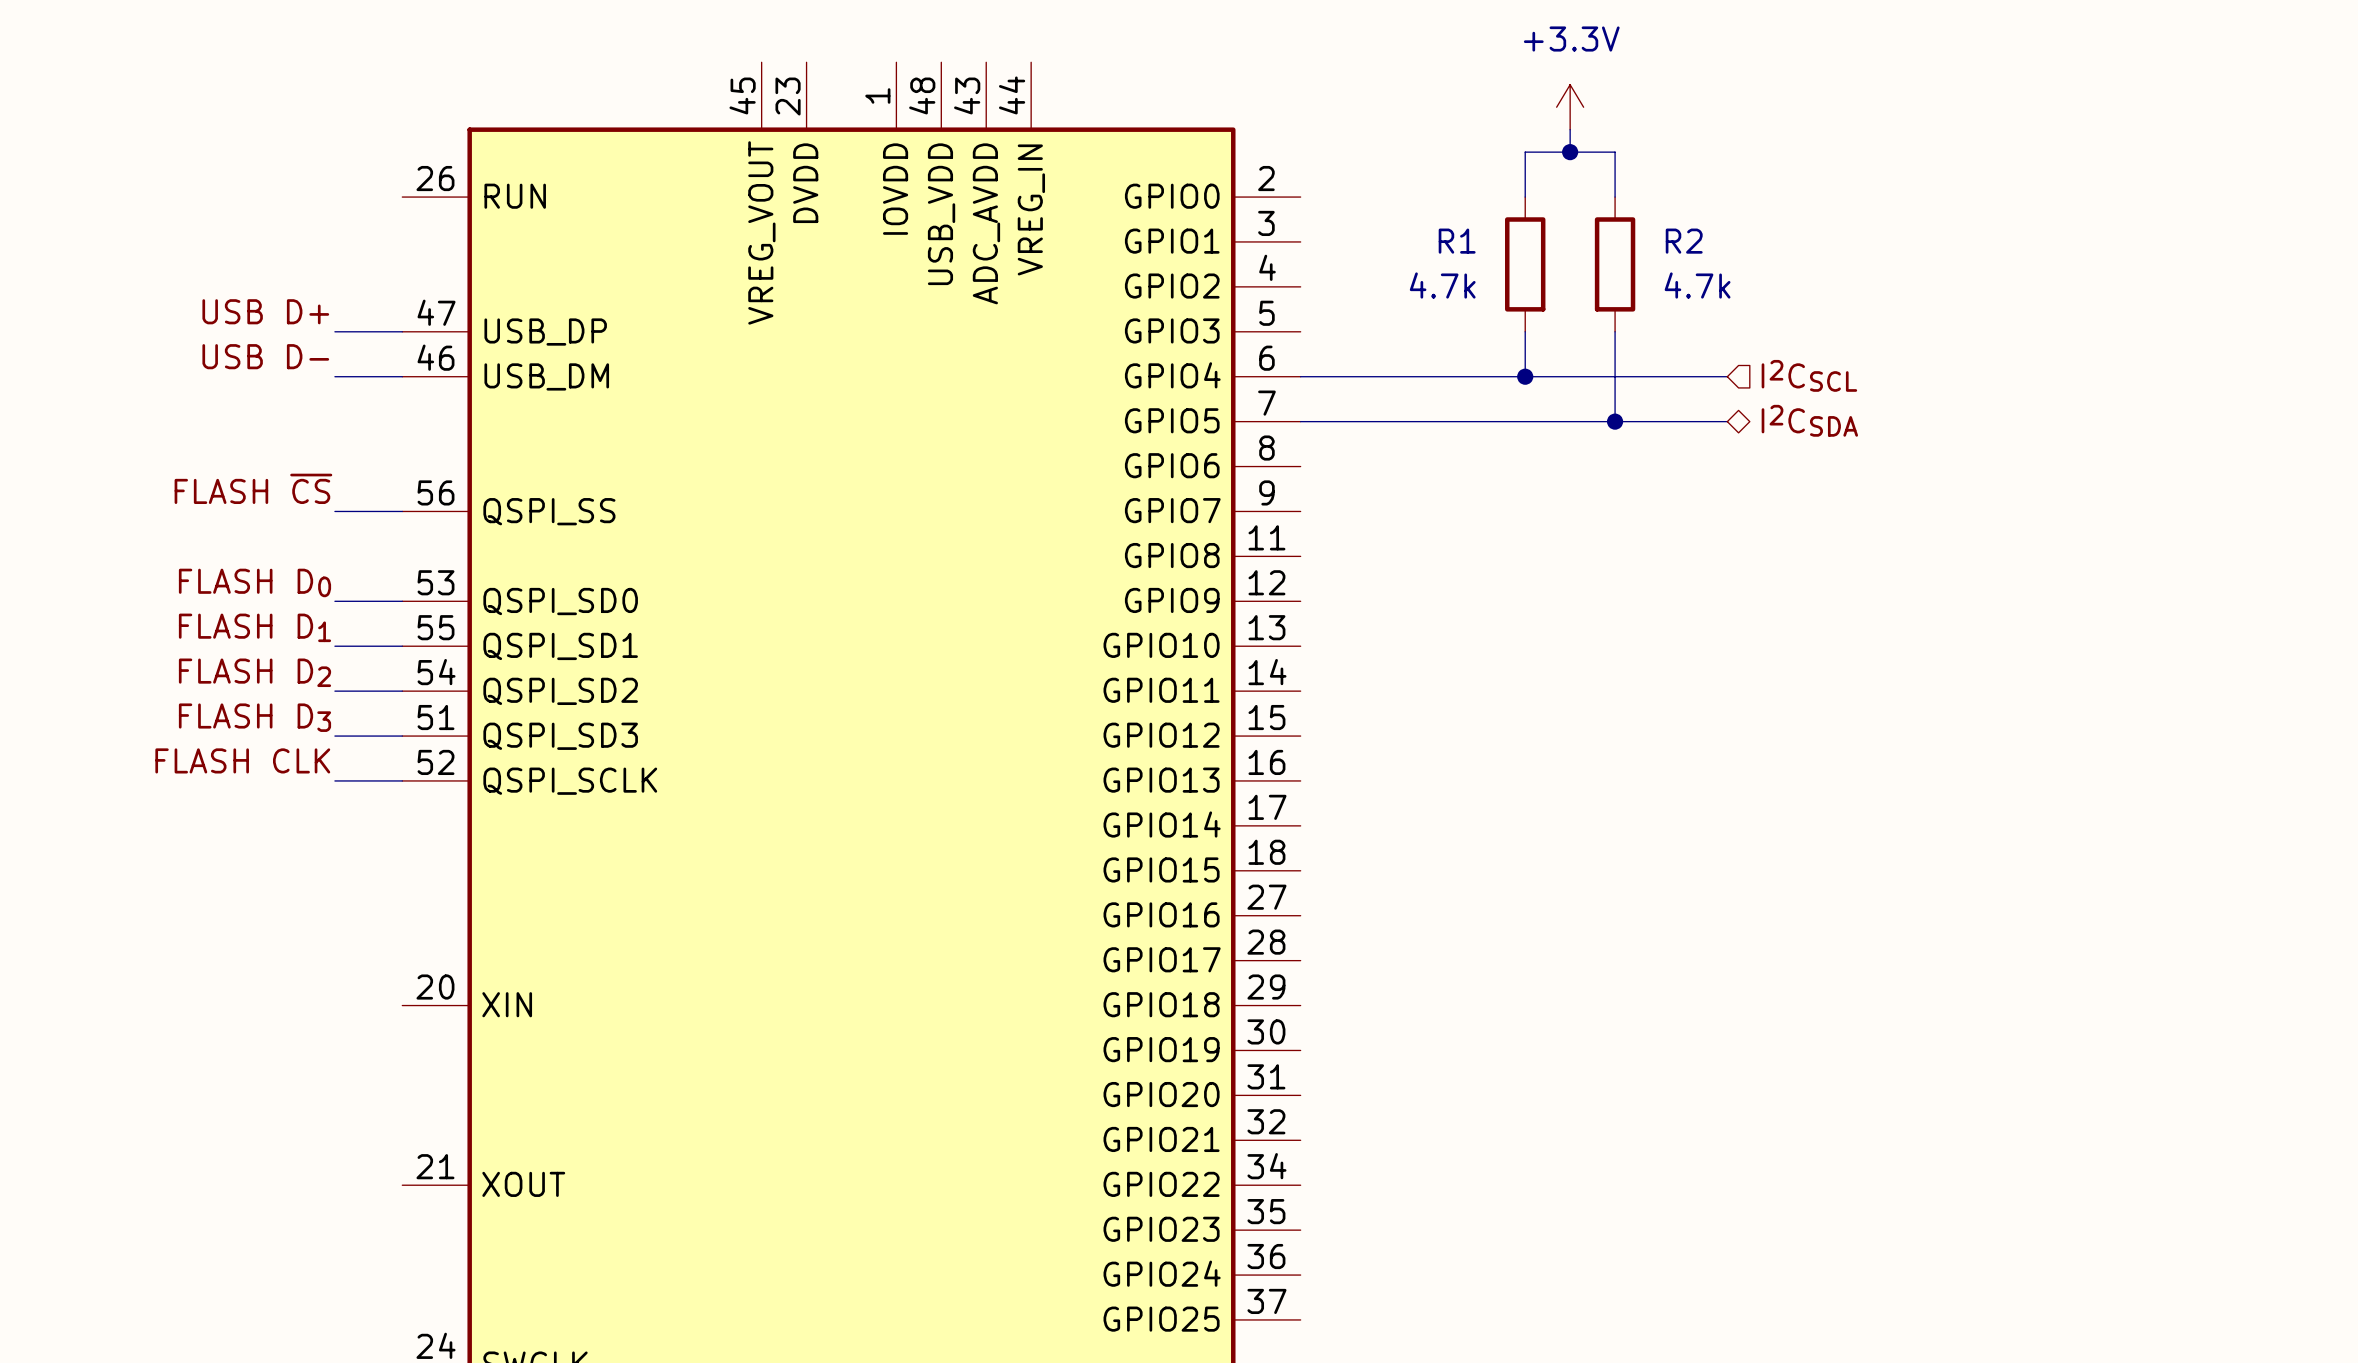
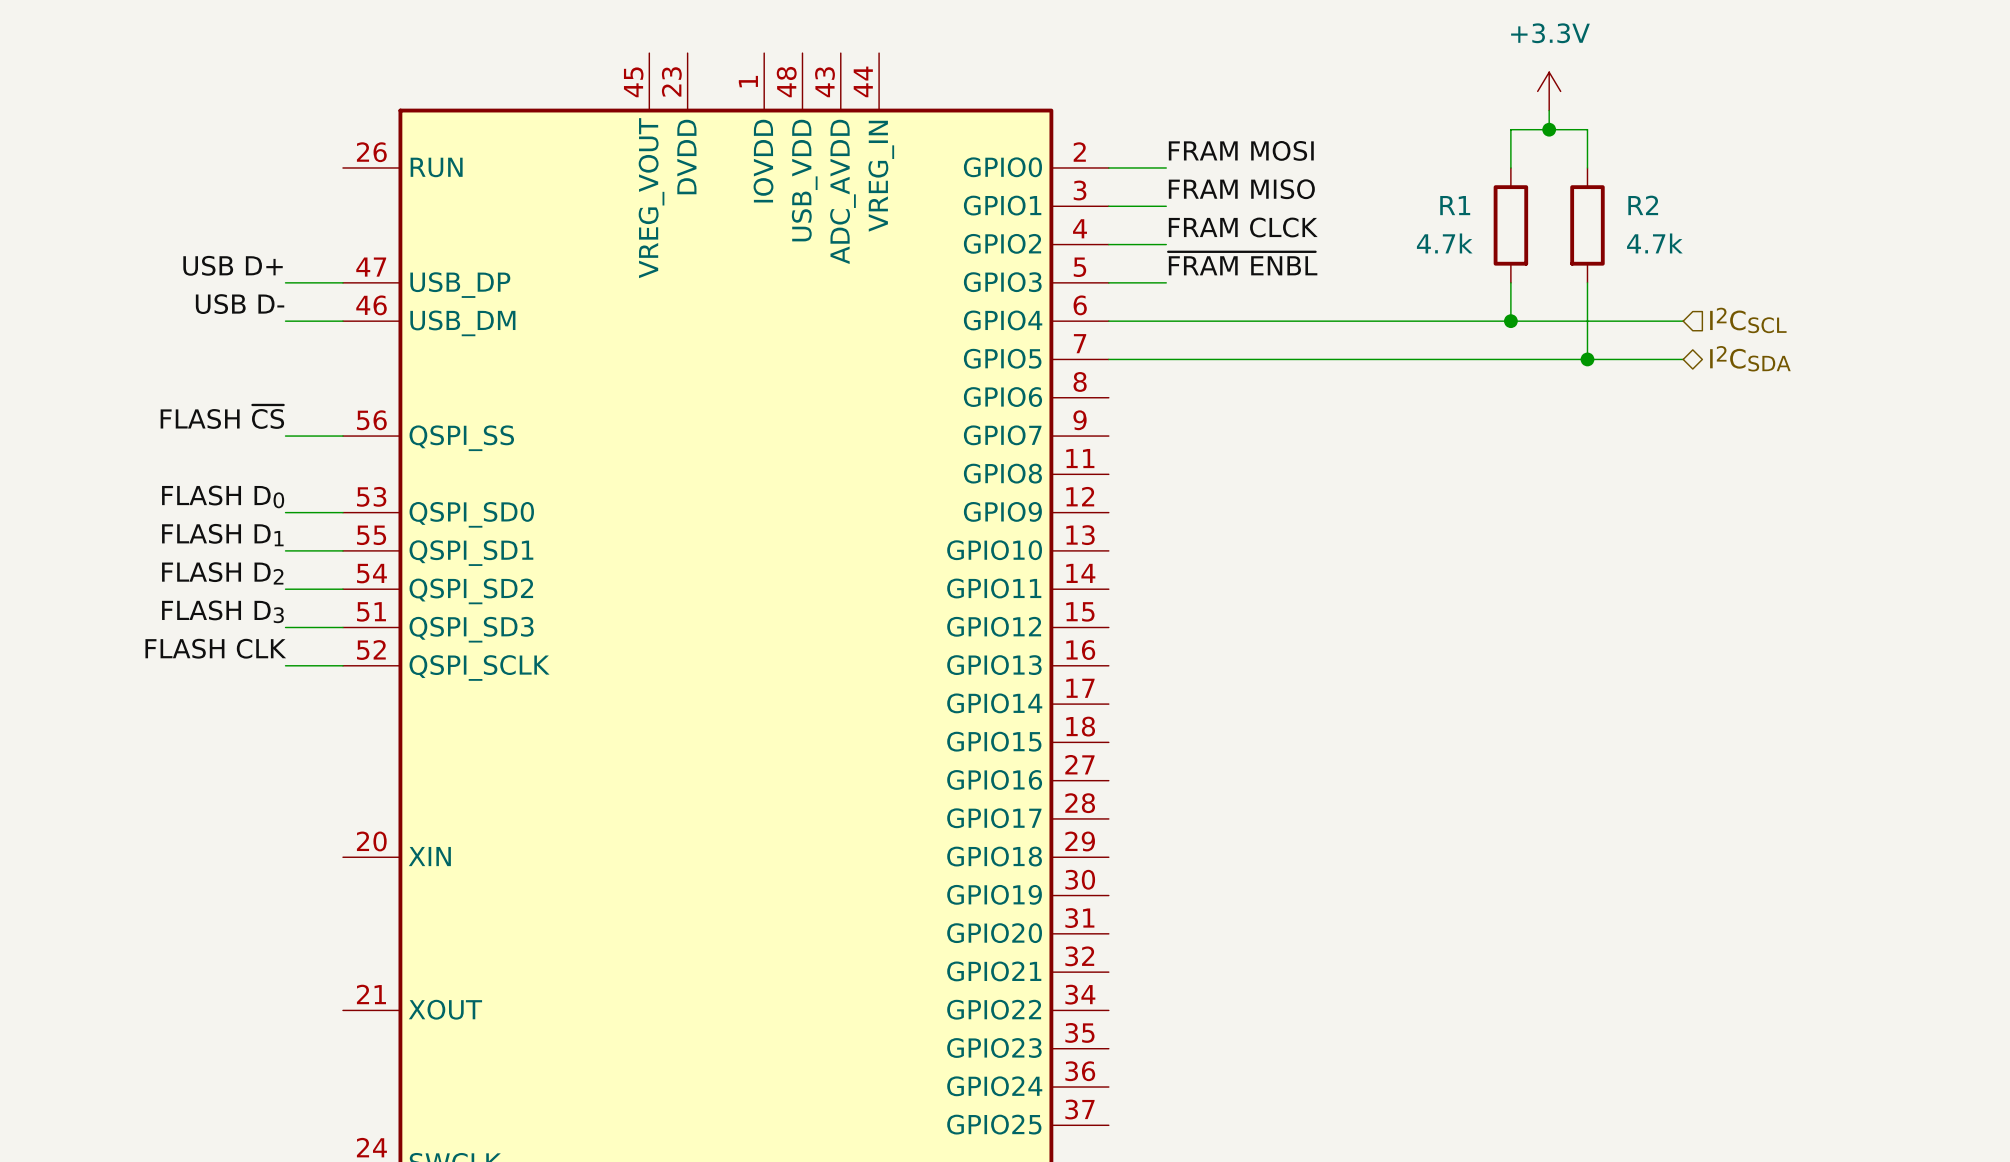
power symbol position: +3.3V (1570, 107) -> +3.3V (1549, 91)
wire: (1570, 129) (1570, 152) -> (1549, 110) (1549, 129)
junction: (1570, 152) -> none
junction: none -> (1549, 129)
label: none -> FRAM MOSI (1241, 150)
wire: none -> (1108, 167) (1166, 167)
wire: (1525, 197) (1525, 152) (1615, 152) (1615, 197) -> (1510, 167) (1510, 129) (1587, 129) (1587, 167)
label: none -> FRAM MISO (1241, 189)
wire: none -> (1108, 206) (1166, 206)
R1 position: (1525, 264) -> (1510, 225)
R2 position: (1615, 264) -> (1587, 225)
label: none -> FRAM CLCK (1243, 227)
wire: none -> (1108, 244) (1166, 244)
label: none -> ~{FRAM ENBL} (1242, 263)
wire: none -> (1108, 282) (1166, 282)
wire: (1525, 331) (1525, 376) -> (1510, 282) (1510, 321)
wire: (1615, 331) (1615, 421) -> (1587, 282) (1587, 359)
hierarchical label position: I2CSCL (1809, 375) -> I2CSCL (1748, 320)
junction: (1525, 376) -> none
wire: none -> (1472, 321) (1683, 321)
junction: none -> (1510, 321)
hierarchical label position: I2CSDA (1809, 420) -> I2CSDA (1750, 358)
junction: (1615, 421) -> none
wire: none -> (1472, 359) (1683, 359)
junction: none -> (1587, 359)

